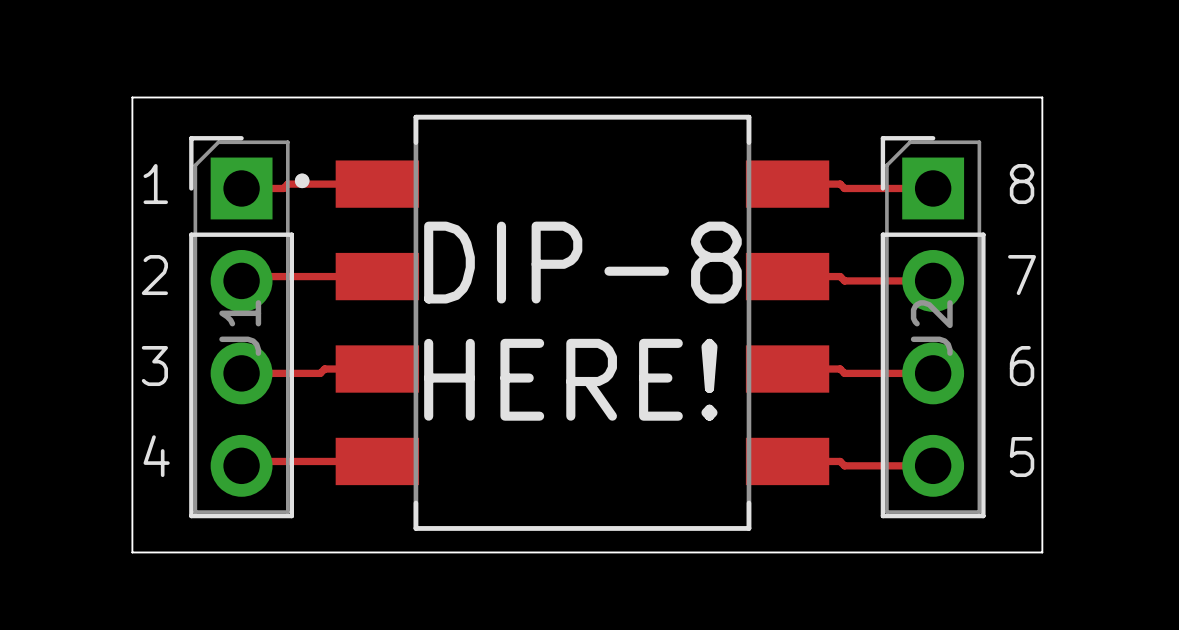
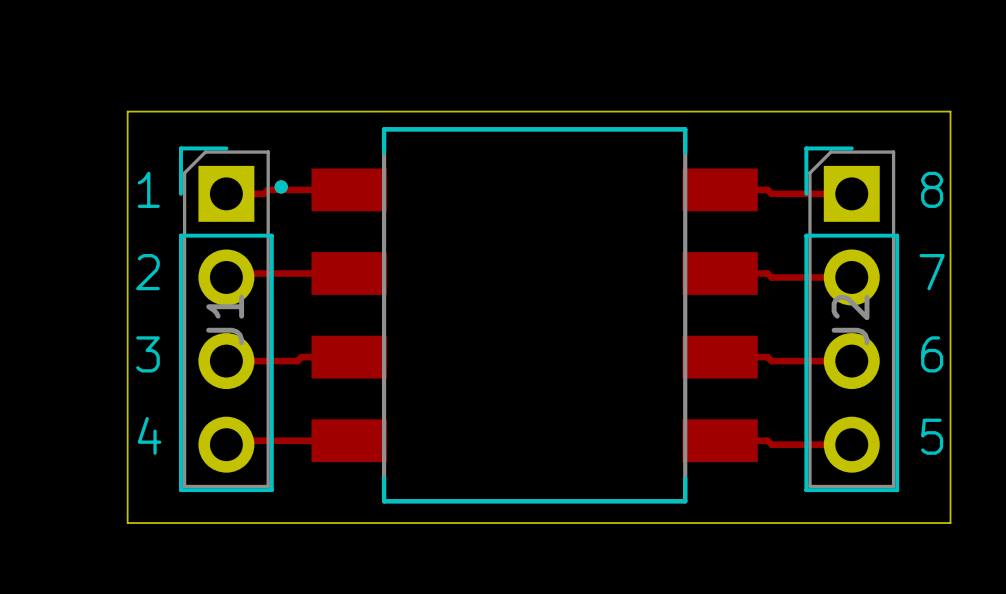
text: DIP-8 (582, 262) -> none
text: HERE! (570, 379) -> none

